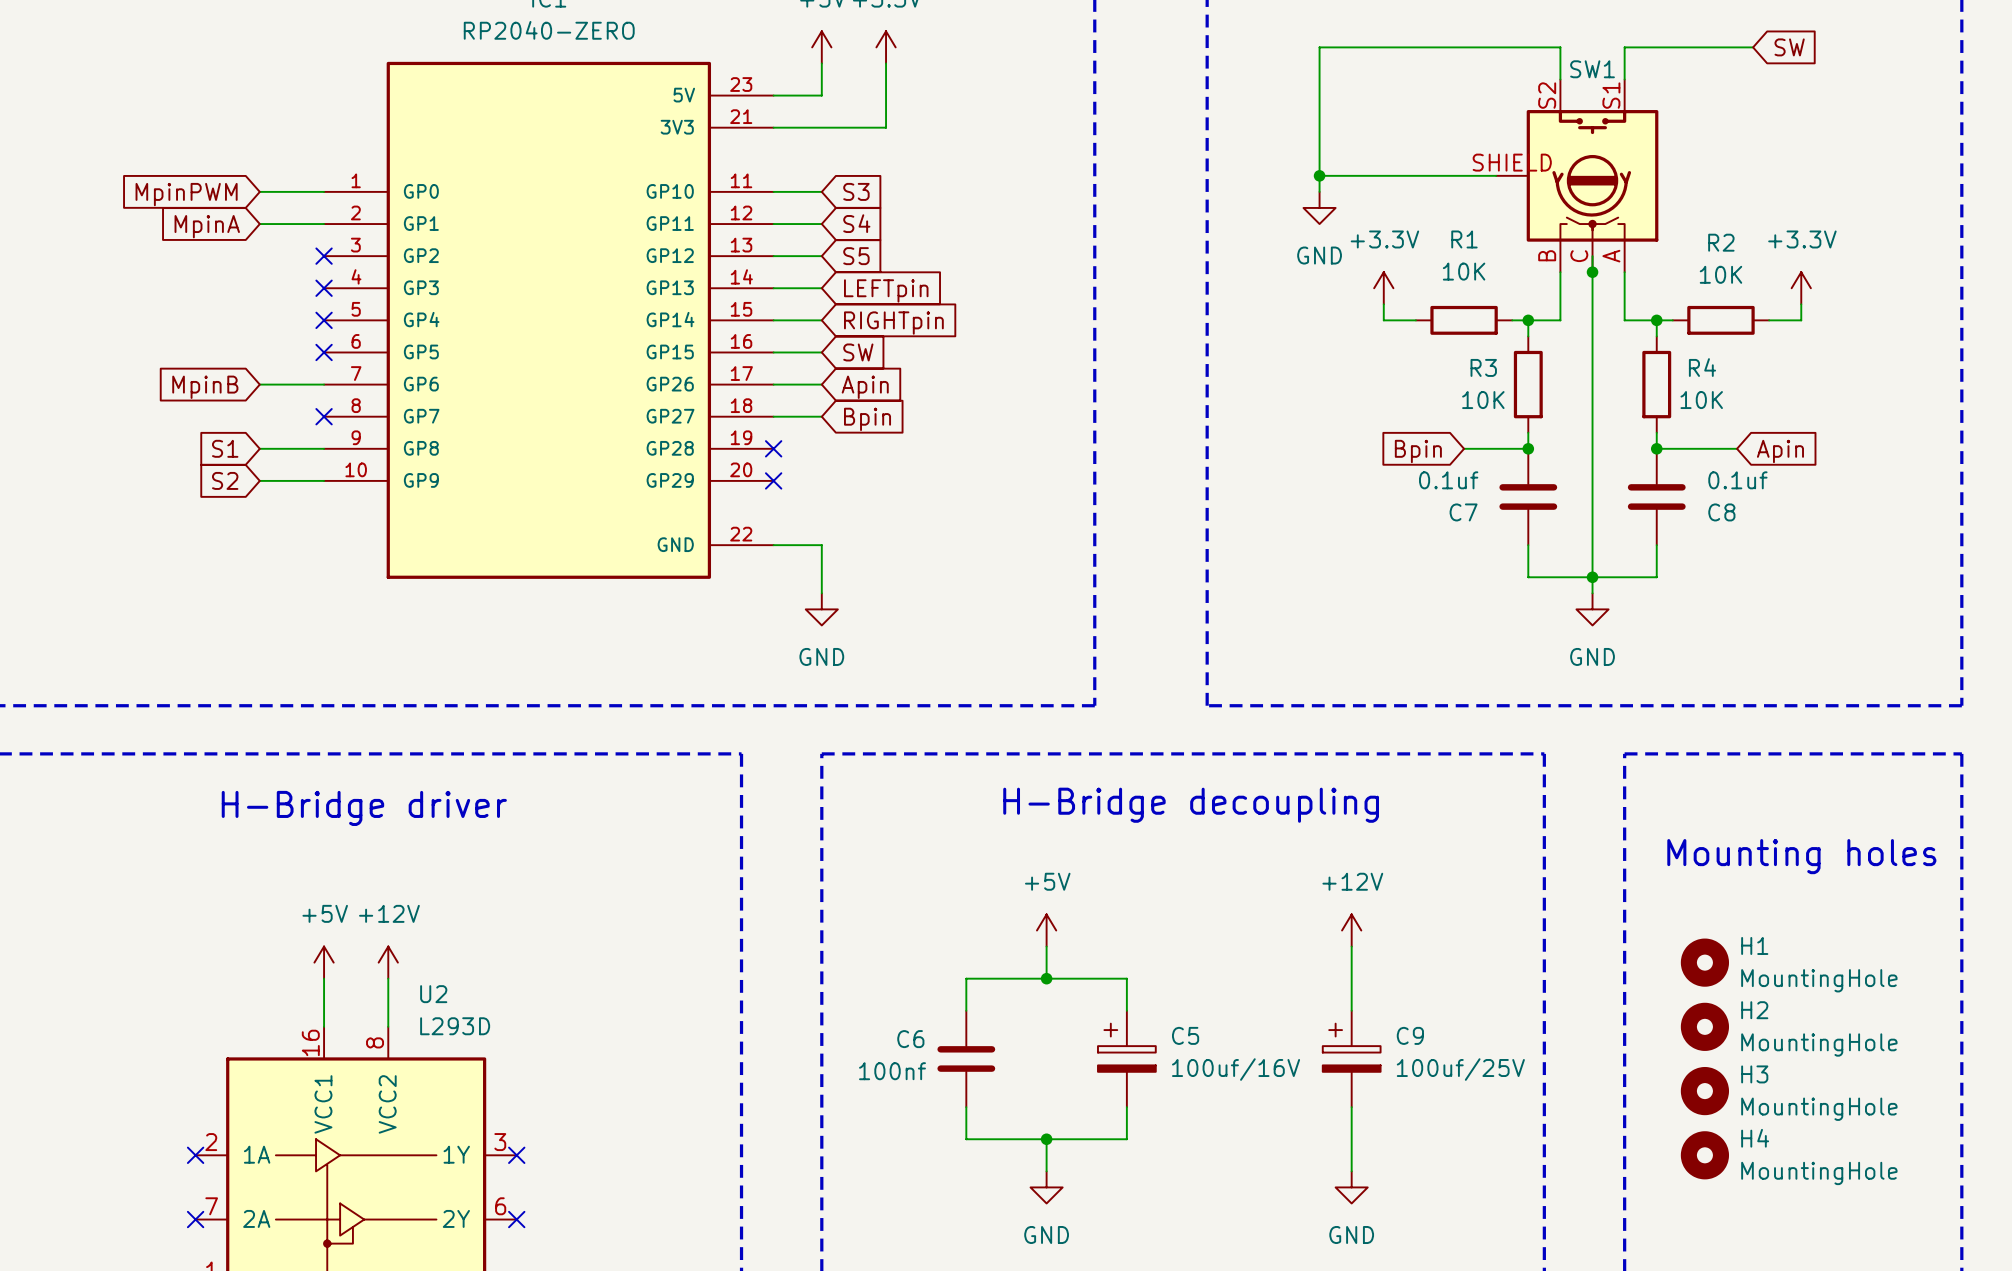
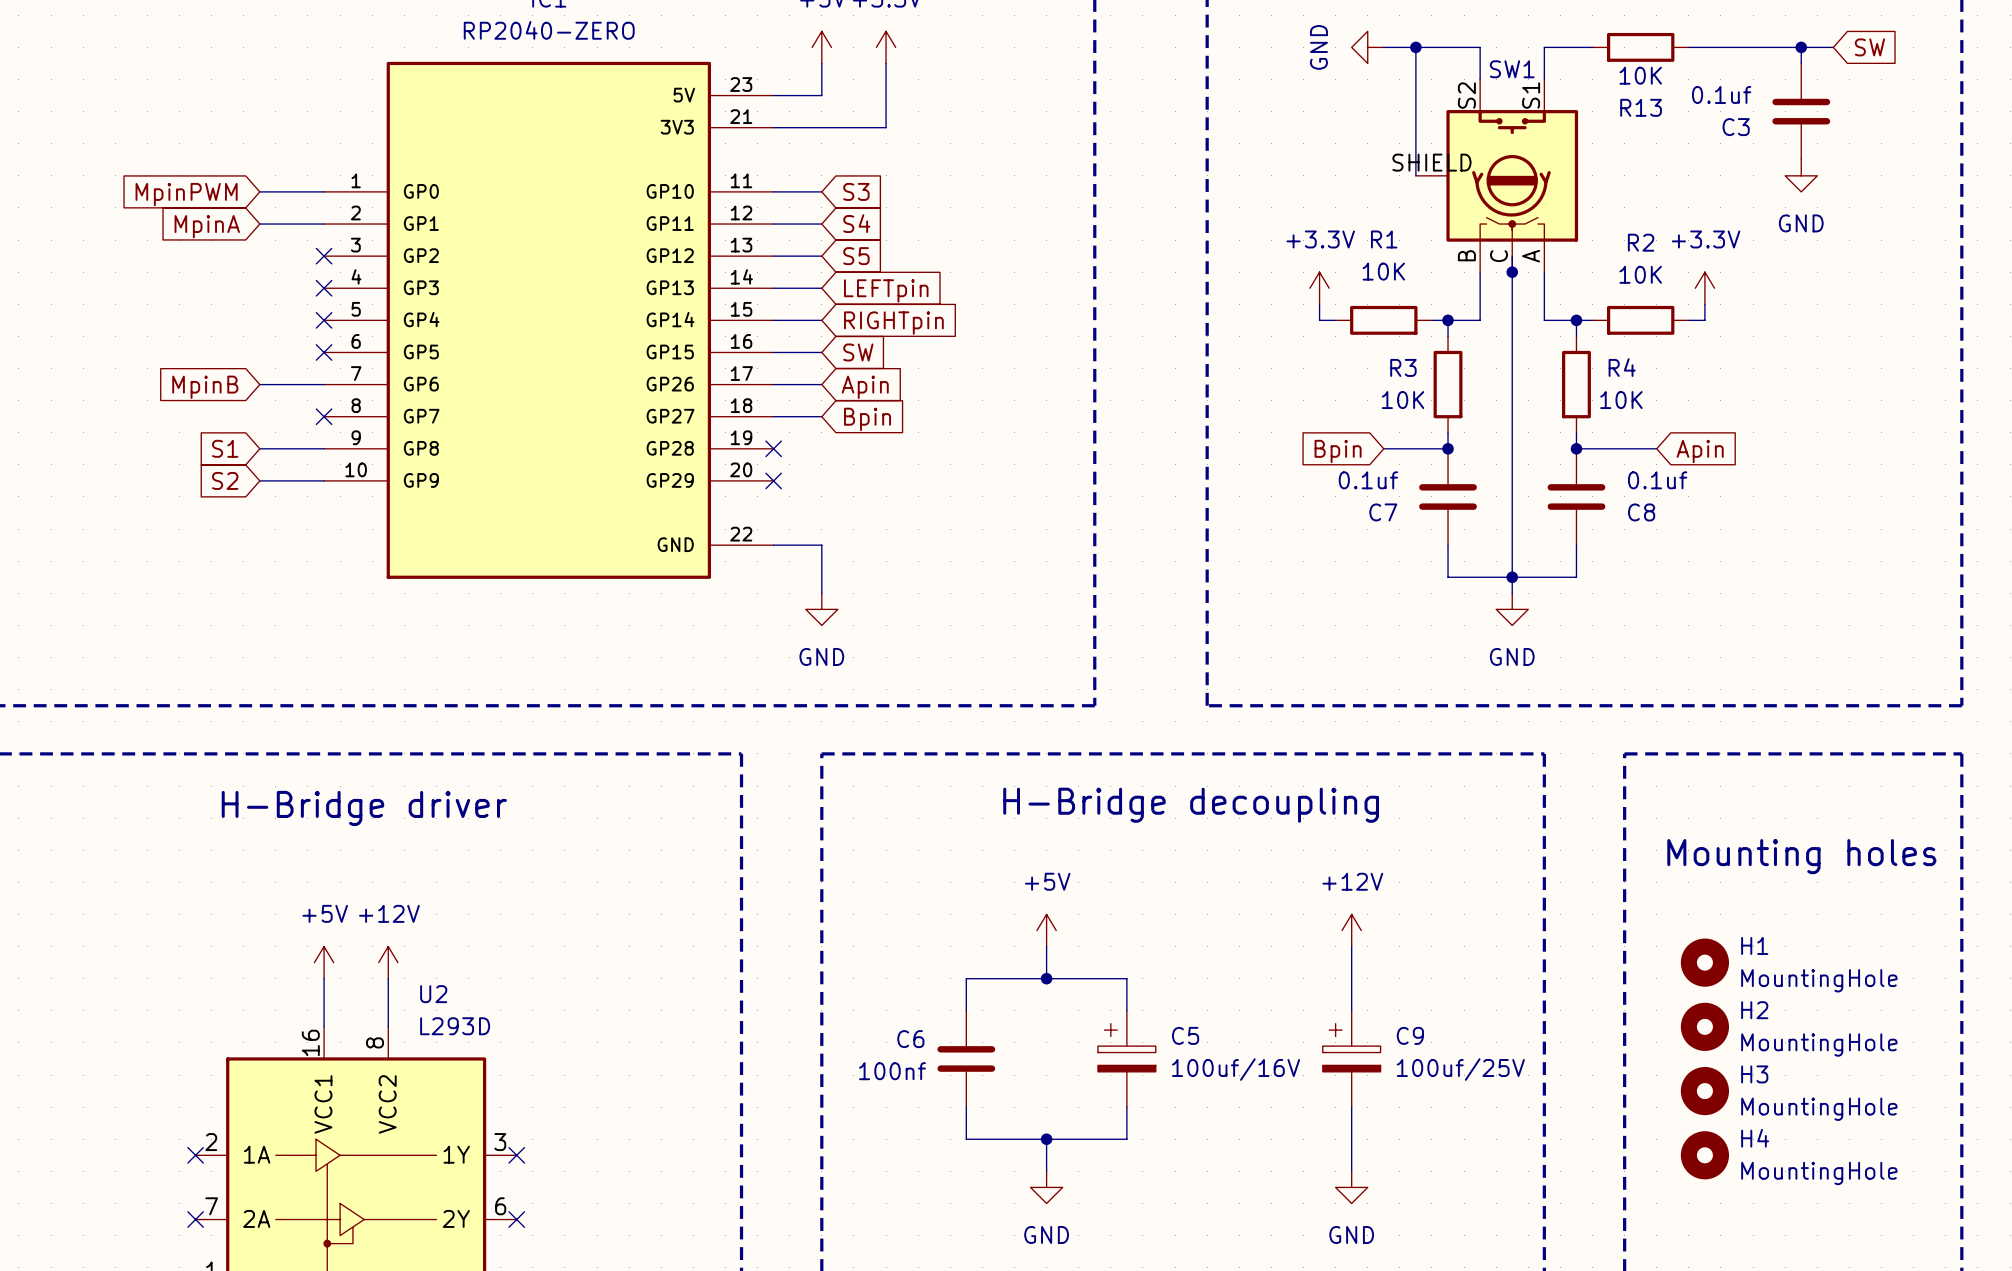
wire: (1383, 47) (1319, 47) (1319, 191) -> none
wire: none -> (1415, 47) (1415, 175)
junction: none -> (1415, 47)
wire: (1480, 47) (1544, 47) -> (1480, 47) (1480, 79)
wire: none -> (1544, 47) (1544, 79)
wire: (1560, 47) (1560, 79) -> (1560, 47) (1592, 47)
R13: none -> 10K (1640, 47)
wire: (1688, 47) (1624, 47) (1624, 79) -> none
wire: none -> (1753, 47) (1833, 47)
global label position: SW (1789, 47) -> SW (1869, 47)
junction: none -> (1801, 47)
C3: none -> 0.1uf (1801, 111)
wire: (1319, 175) (1496, 175) -> none
junction: (1319, 175) -> none
SW1 position: (1577, 175) -> (1496, 175)
power symbol: none -> GND (1801, 175)
power symbol rotation: 0° (1319, 207) -> 90° clockwise (1367, 47)
power symbol position: GND (1319, 207) -> GND (1367, 47)
wire: (1592, 256) (1592, 593) -> (1512, 256) (1512, 593)
wire: none -> (1480, 272) (1480, 320) (1431, 320)
junction: none -> (1512, 272)
wire: (1560, 272) (1560, 320) -> (1592, 320) (1560, 320)
junction: (1592, 272) -> none
wire: (1624, 272) (1624, 320) (1672, 320) -> none
power symbol position: +3.3V (1383, 288) -> +3.3V (1319, 288)
power symbol position: +3.3V (1801, 288) -> +3.3V (1704, 288)
wire: none -> (1319, 304) (1319, 320) (1335, 320)
wire: (1383, 304) (1383, 320) (1415, 320) -> none
wire: none -> (1704, 304) (1704, 320) (1688, 320)
wire: (1801, 304) (1801, 320) (1769, 320) -> none
junction: none -> (1448, 320)
R1 position: (1464, 320) -> (1383, 320)
wire: (1512, 320) (1544, 320) -> (1544, 272) (1544, 320)
wire: (1528, 320) (1528, 336) -> (1448, 320) (1448, 336)
junction: (1528, 320) -> none
junction: none -> (1576, 320)
wire: (1656, 320) (1656, 336) -> (1576, 320) (1576, 336)
junction: (1656, 320) -> none
R2 position: (1720, 320) -> (1640, 320)
R3 position: (1528, 384) -> (1448, 384)
R4 position: (1656, 384) -> (1576, 384)
wire: (1528, 432) (1528, 448) (1464, 448) -> (1448, 432) (1448, 448) (1383, 448)
wire: (1656, 432) (1656, 448) (1737, 448) -> (1576, 432) (1576, 448) (1656, 448)
junction: none -> (1448, 448)
junction: (1528, 448) -> none
junction: none -> (1576, 448)
junction: (1656, 448) -> none
global label position: Bpin (1418, 451) -> Bpin (1338, 451)
global label position: Apin (1780, 451) -> Apin (1700, 451)
C7 position: (1528, 496) -> (1448, 496)
C8 position: (1656, 496) -> (1576, 496)
wire: (1528, 545) (1528, 577) -> (1448, 545) (1448, 577) (1528, 577)
wire: (1656, 545) (1656, 577) (1576, 577) -> (1576, 545) (1576, 577)
junction: none -> (1512, 577)
junction: (1592, 577) -> none
power symbol position: GND (1592, 609) -> GND (1512, 609)

